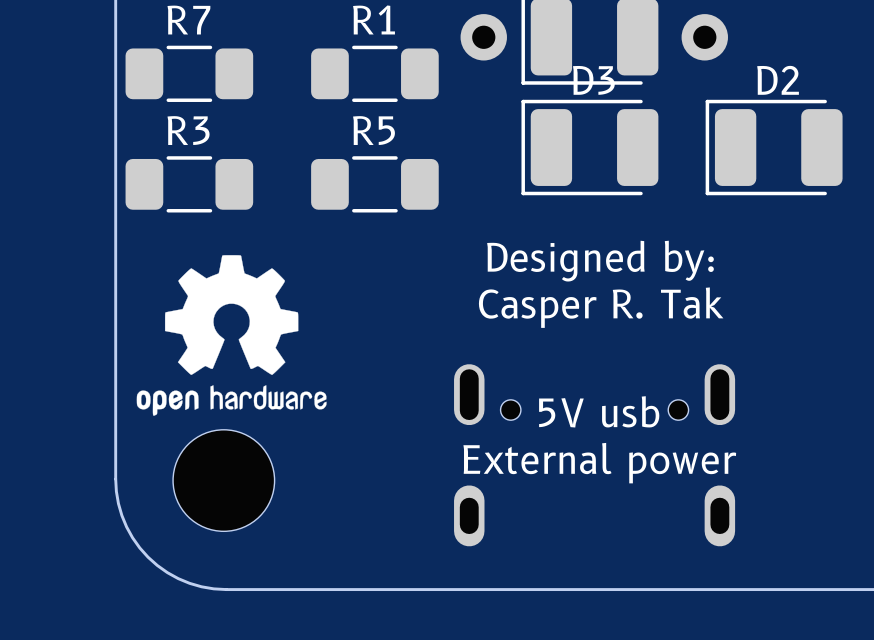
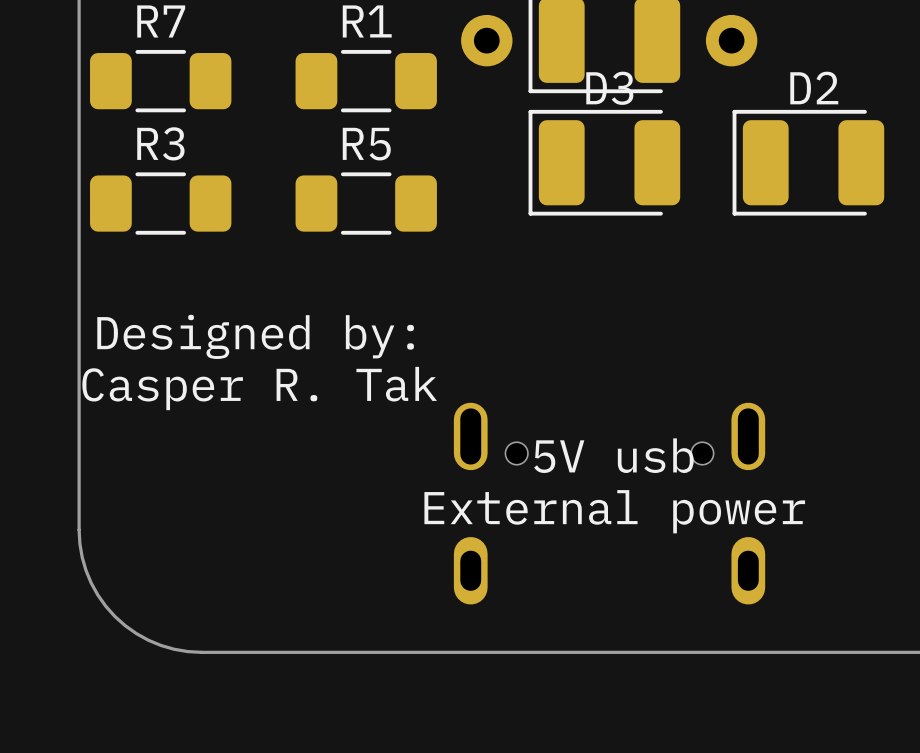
drawing: [136, 255, 327, 416] -> none
text position: Designed by: (600, 261) -> Designed by: (255, 336)
text position: Casper R. Tak (601, 307) -> Casper R. Tak (259, 388)
part: (223, 480) -> none

